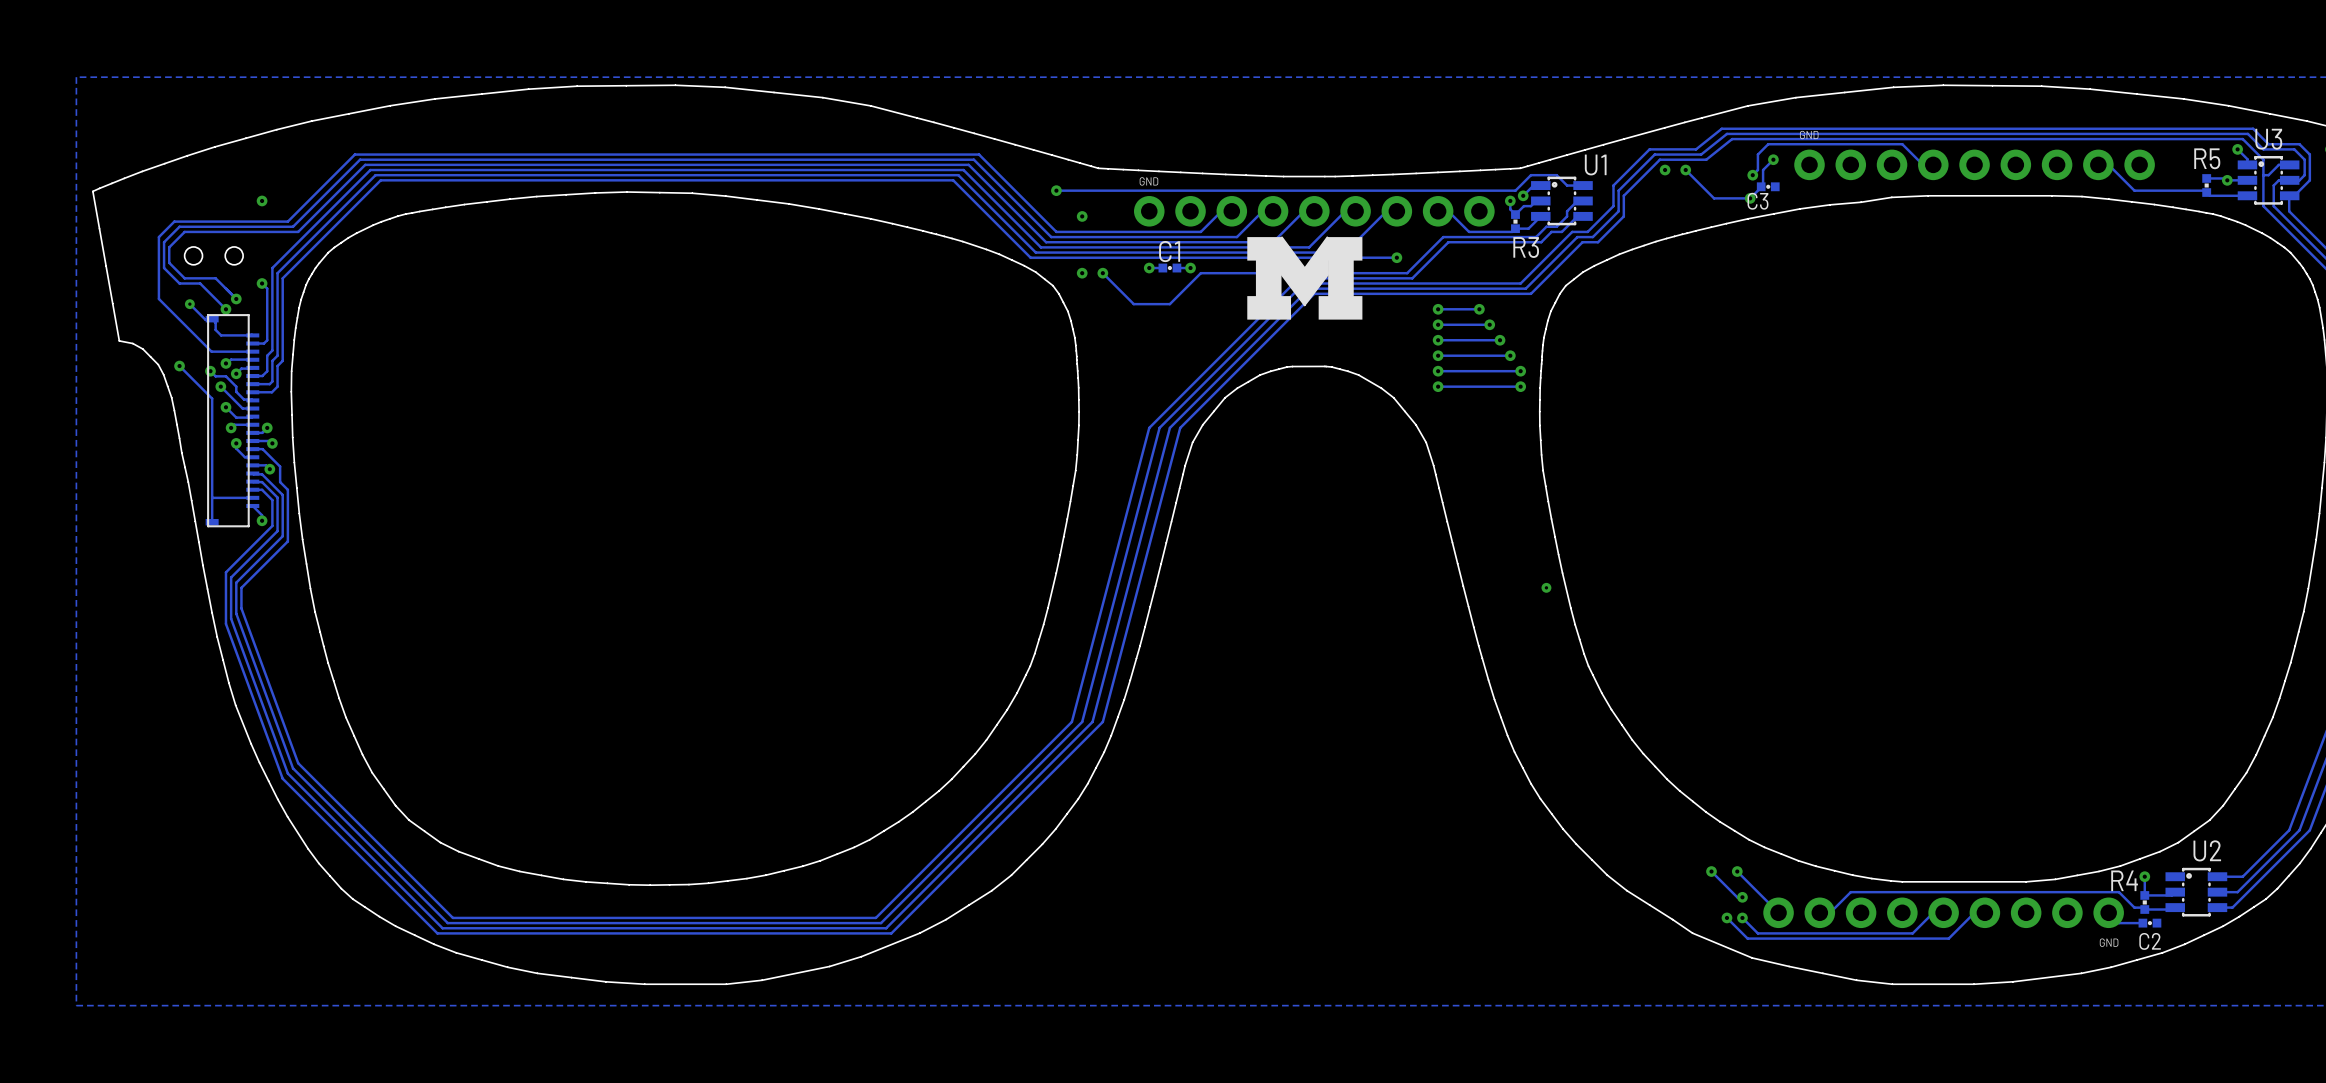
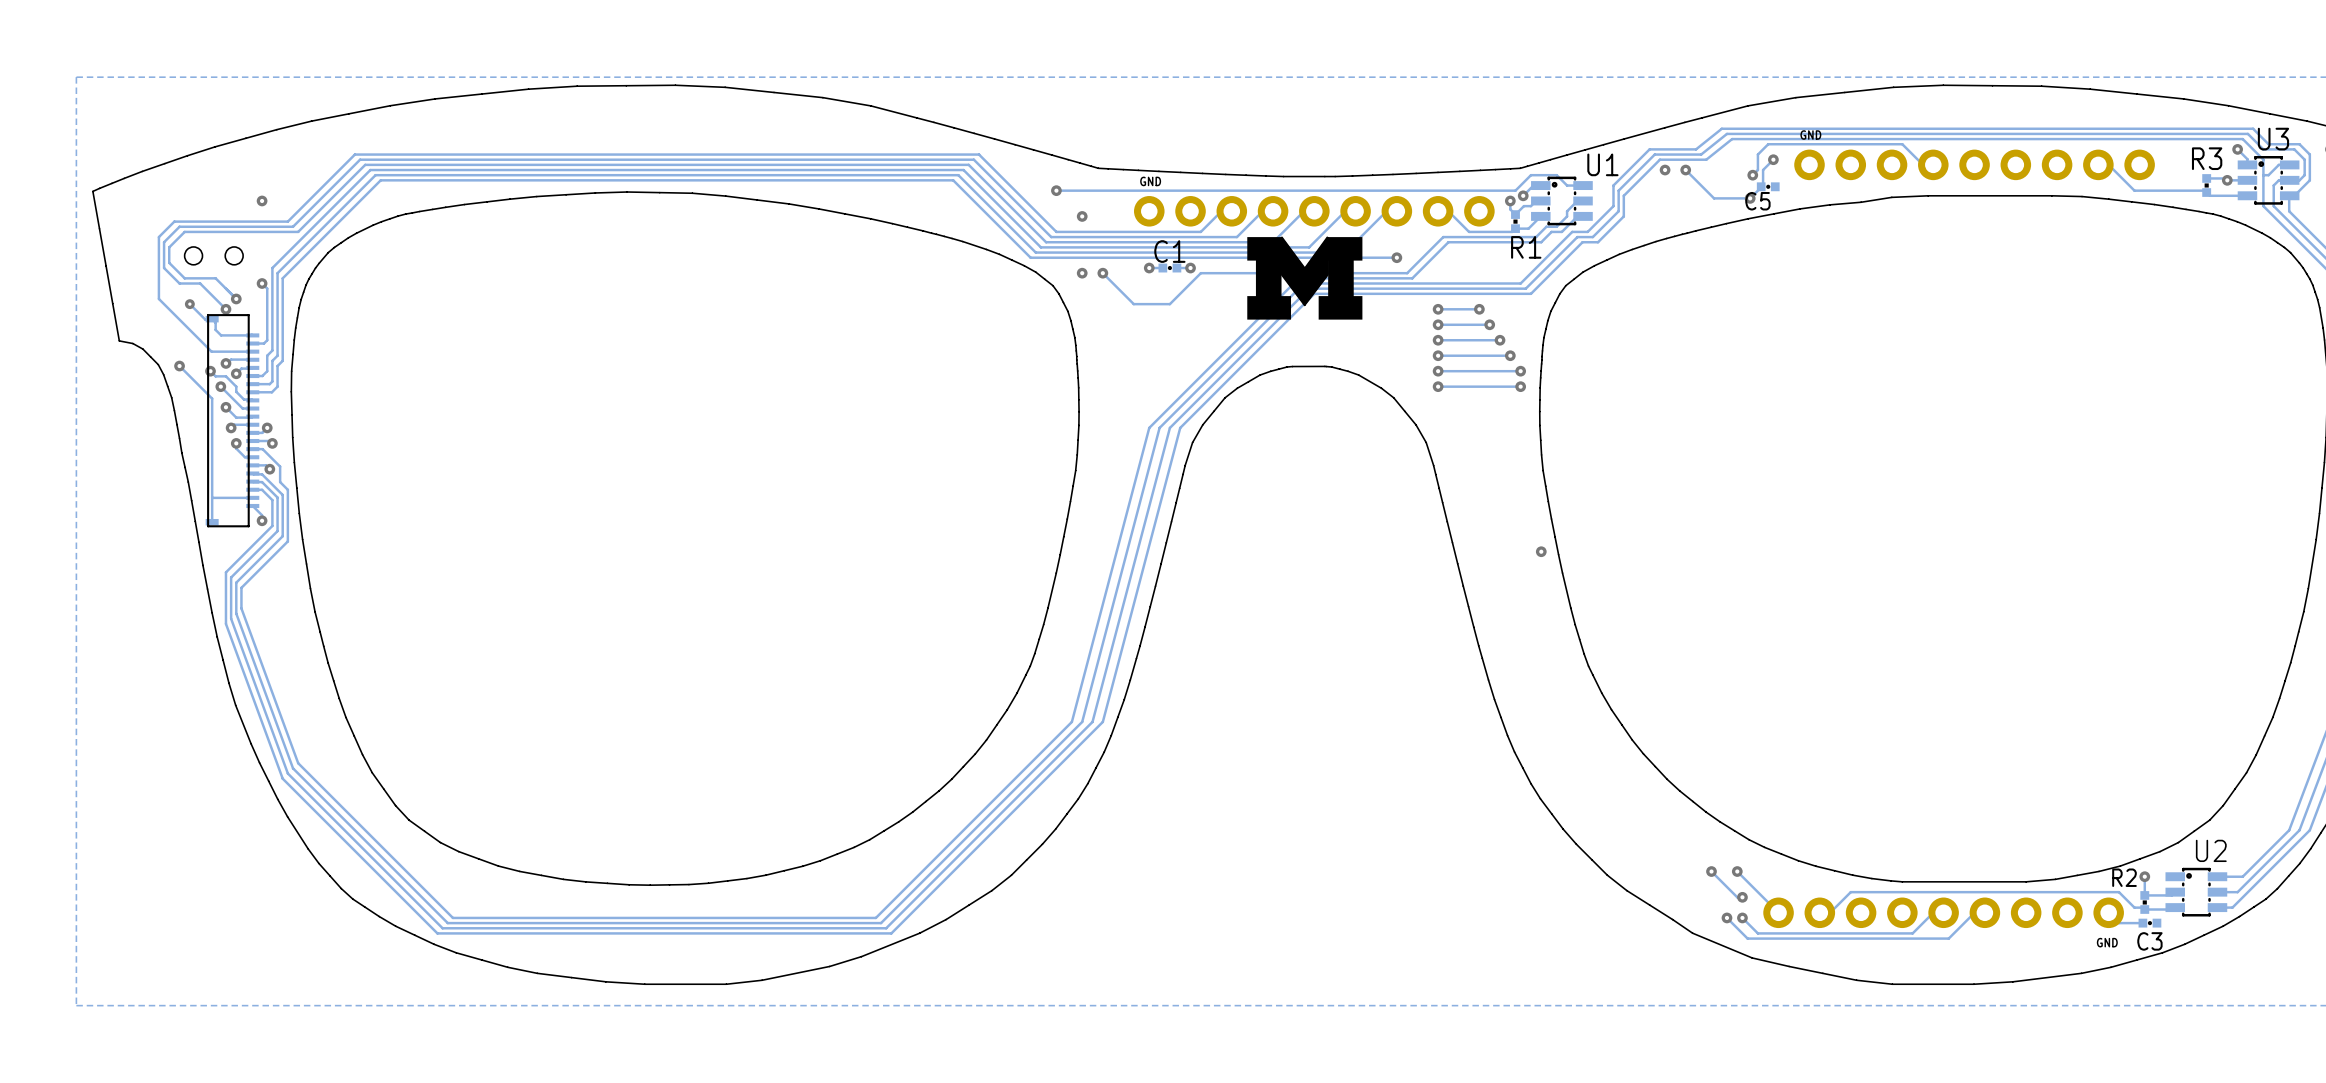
R5 name: R5 (2207, 158) -> R3 (2207, 158)
C3 name: C3 (1758, 201) -> C5 (1757, 201)
R3 name: R3 (1526, 247) -> R1 (1526, 247)
via: none -> (1541, 551)
via: (1546, 587) -> none
R4 name: R4 (2124, 880) -> R2 (2124, 877)
C2 name: C2 (2150, 941) -> C3 (2149, 941)

